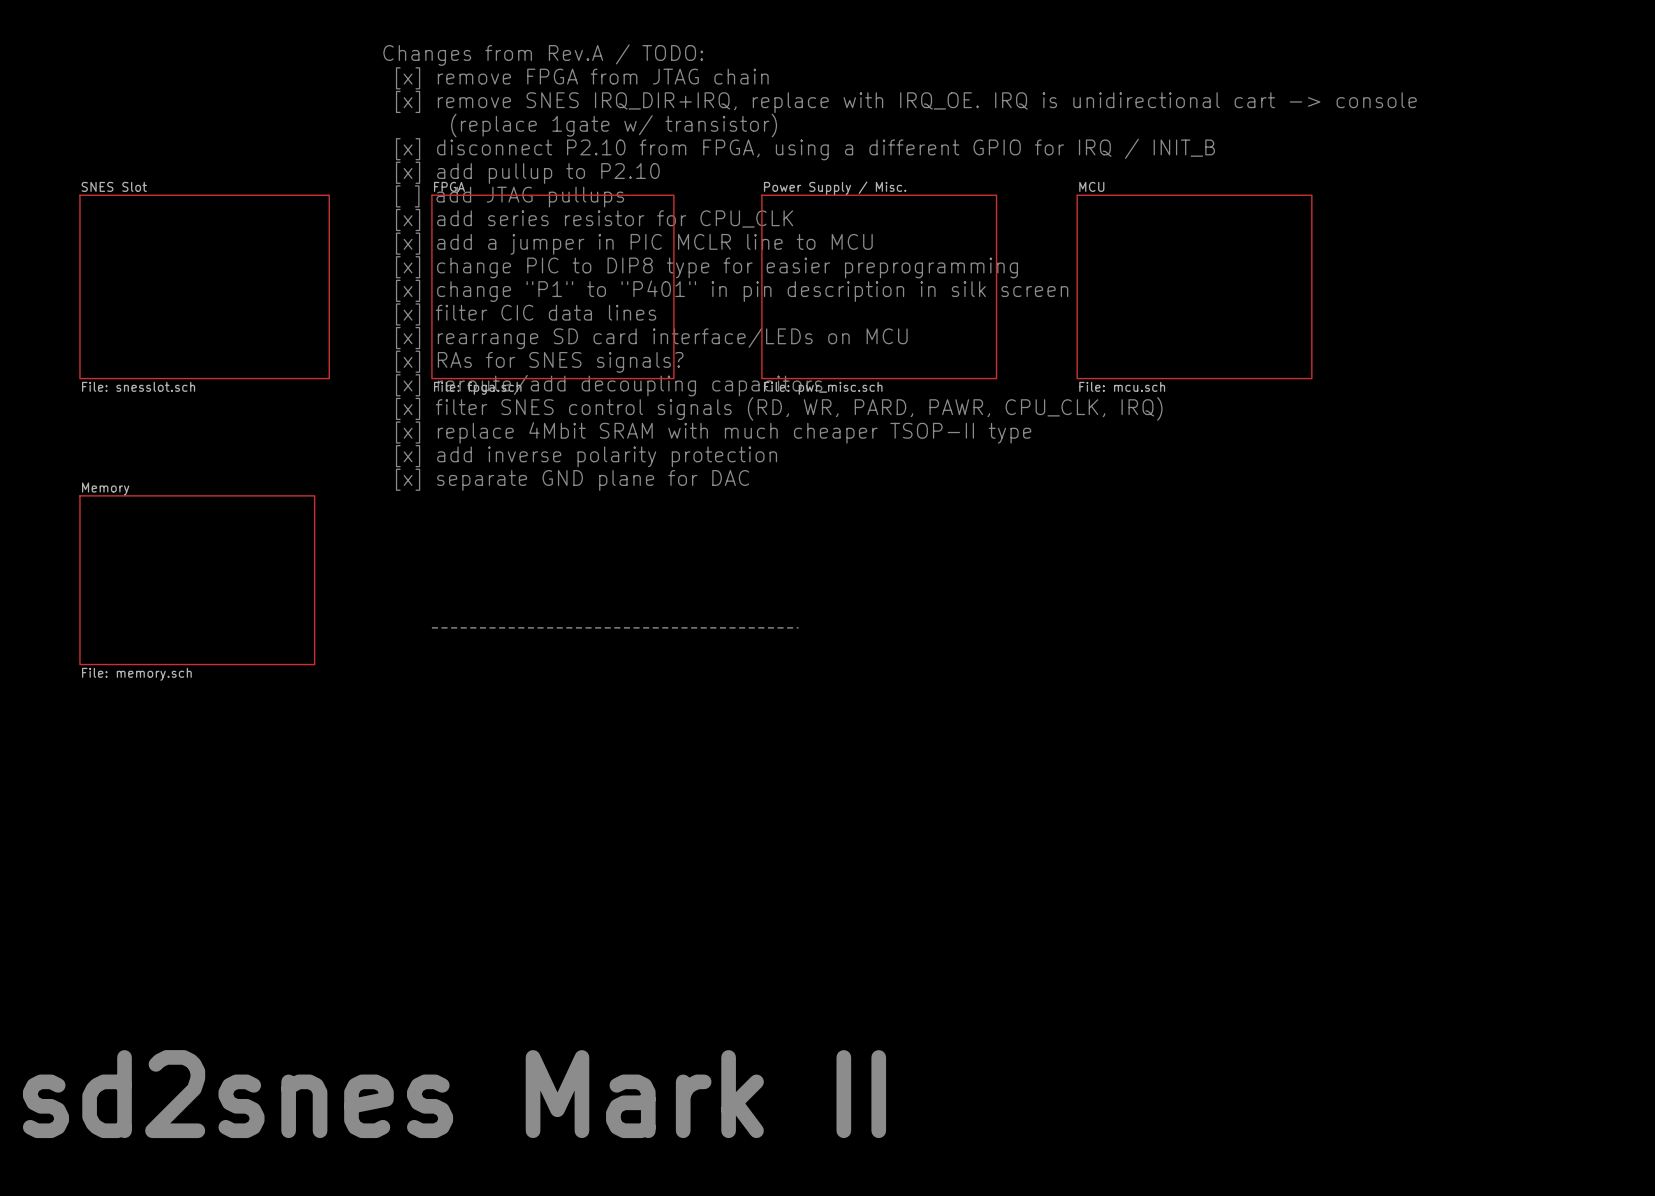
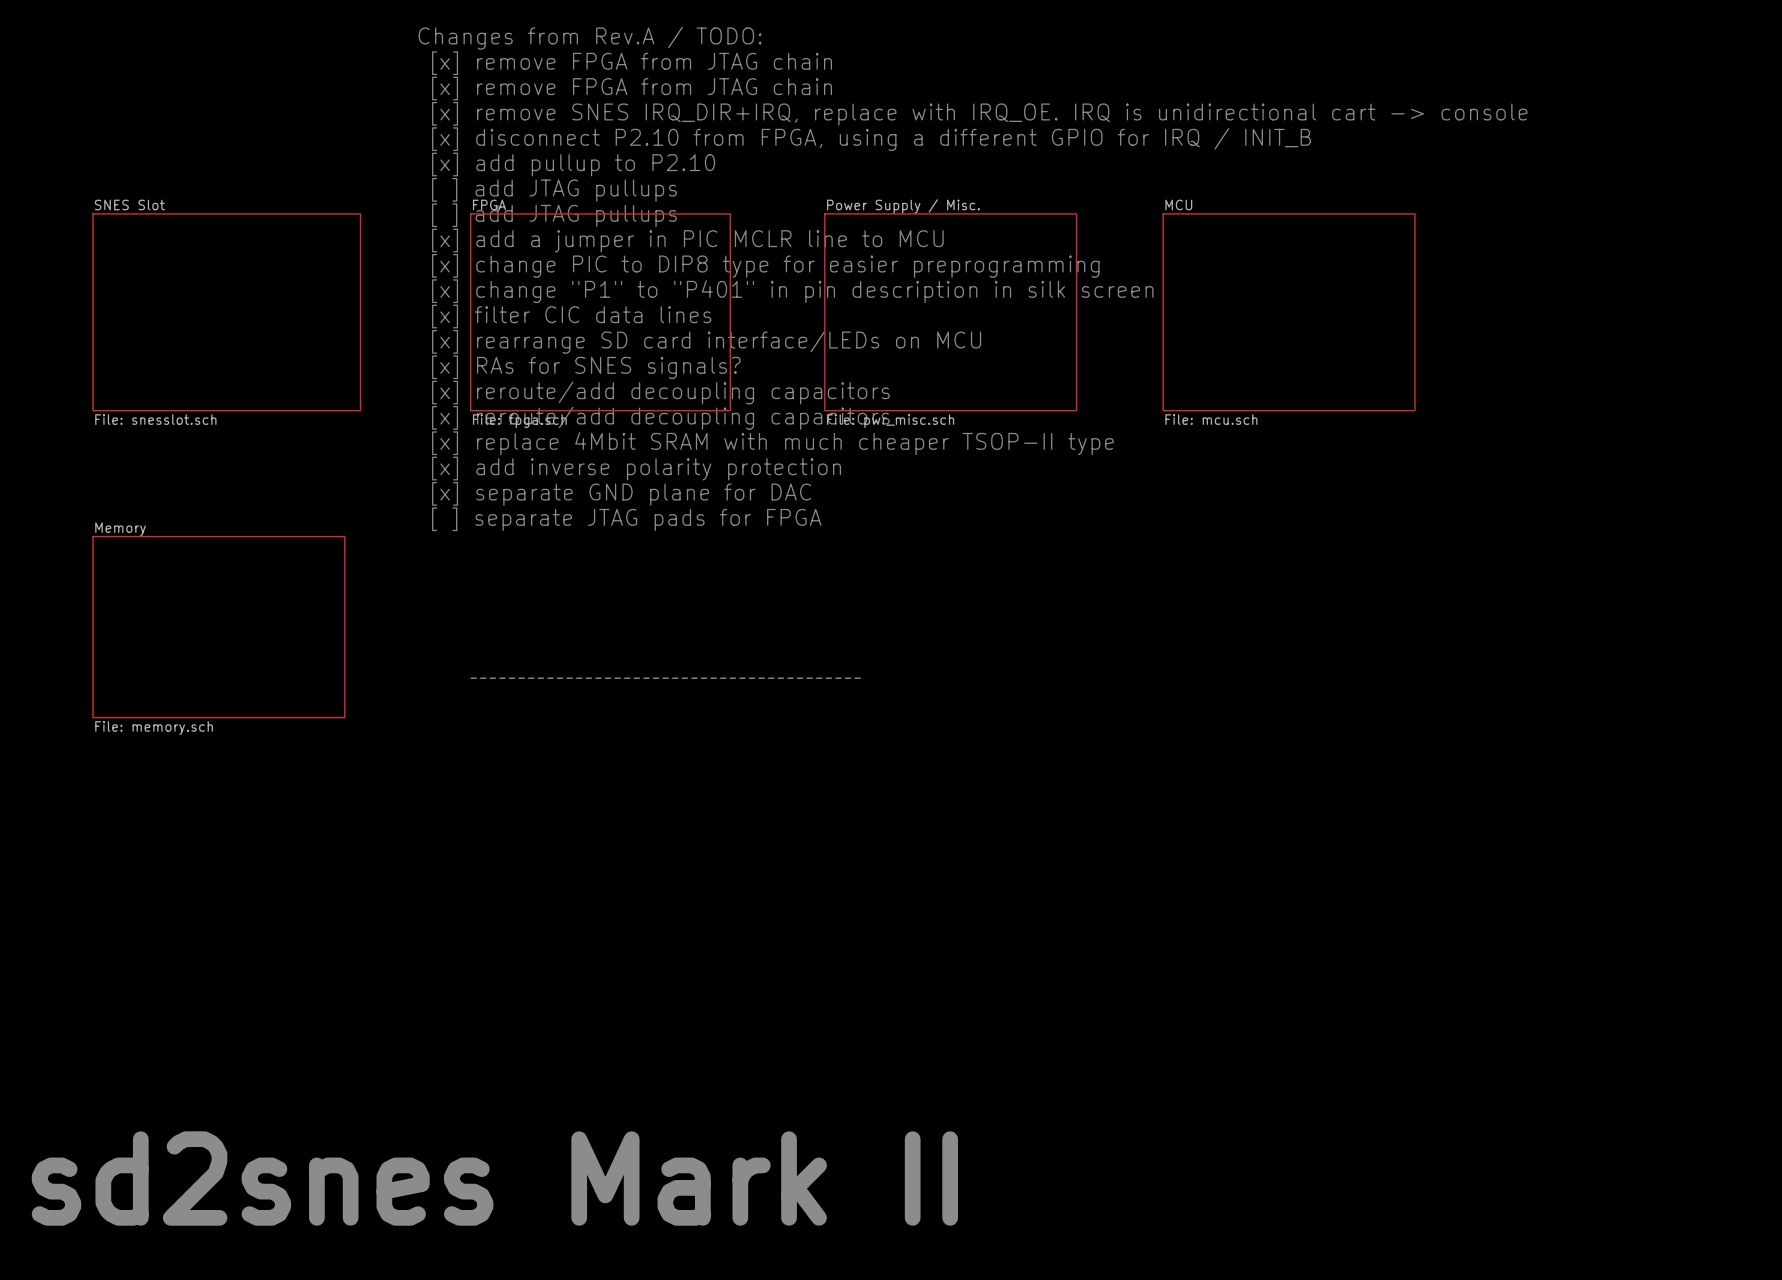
text: none -> Changes from Rev.A / TODO: (590, 38)
text: Changes from Rev.A / TODO: (543, 55) -> [x] remove FPGA from JTAG chain (632, 63)
text: (replace 1gate w/ transistor) (614, 125) -> [x] disconnect P2.10 from FPGA, using a different GPIO for IRQ / INIT_B (871, 139)
text: [x] disconnect P2.10 from FPGA, using a different GPIO for IRQ / INIT_B (805, 149) -> [x] add pullup to P2.10 (573, 164)
text: [x] add pullup to P2.10 (527, 172) -> [ ] add JTAG pullups (554, 189)
text: [x] add series resistor for CPU_CLK (594, 220) -> [x] add a jumper in PIC MCLR line to MCU (687, 240)
text: [x] add a jumper in PIC MCLR line to MCU (634, 243) -> [x] change PIC to DIP8 type for easier preprogramming (765, 265)
text: [x] change PIC to DIP8 type for easier preprogramming (706, 267) -> [x] change "P1" to "P401" in pin description in silk screen (792, 291)
text: [x] change "P1" to "P401" in pin description in silk screen (732, 290) -> [x] filter CIC data lines (571, 316)
text: [x] filter CIC data lines (526, 314) -> [x] rearrange SD card interface/LEDs on MCU (706, 341)
text: [x] rearrange SD card interface/LEDs on MCU (651, 338) -> [x] RAs for SNES signals? (586, 367)
text: [x] RAs for SNES signals? (539, 361) -> [x] reroute/add decoupling capacitors (660, 392)
text: [x] filter SNES control signals (RD, WR, PARD, PAWR, CPU_CLK, IRQ) (779, 408) -> [x] replace 4Mbit SRAM with much cheaper TSOP-II type (772, 443)
text: [x] replace 4Mbit SRAM with much cheaper TSOP-II type (713, 432) -> [x] add inverse polarity protection (636, 468)
text: [x] add inverse polarity protection (586, 456) -> [x] separate GND plane for DAC (621, 493)
text: [x] separate GND plane for DAC (572, 479) -> [ ] separate JTAG pads for FPGA (626, 519)

